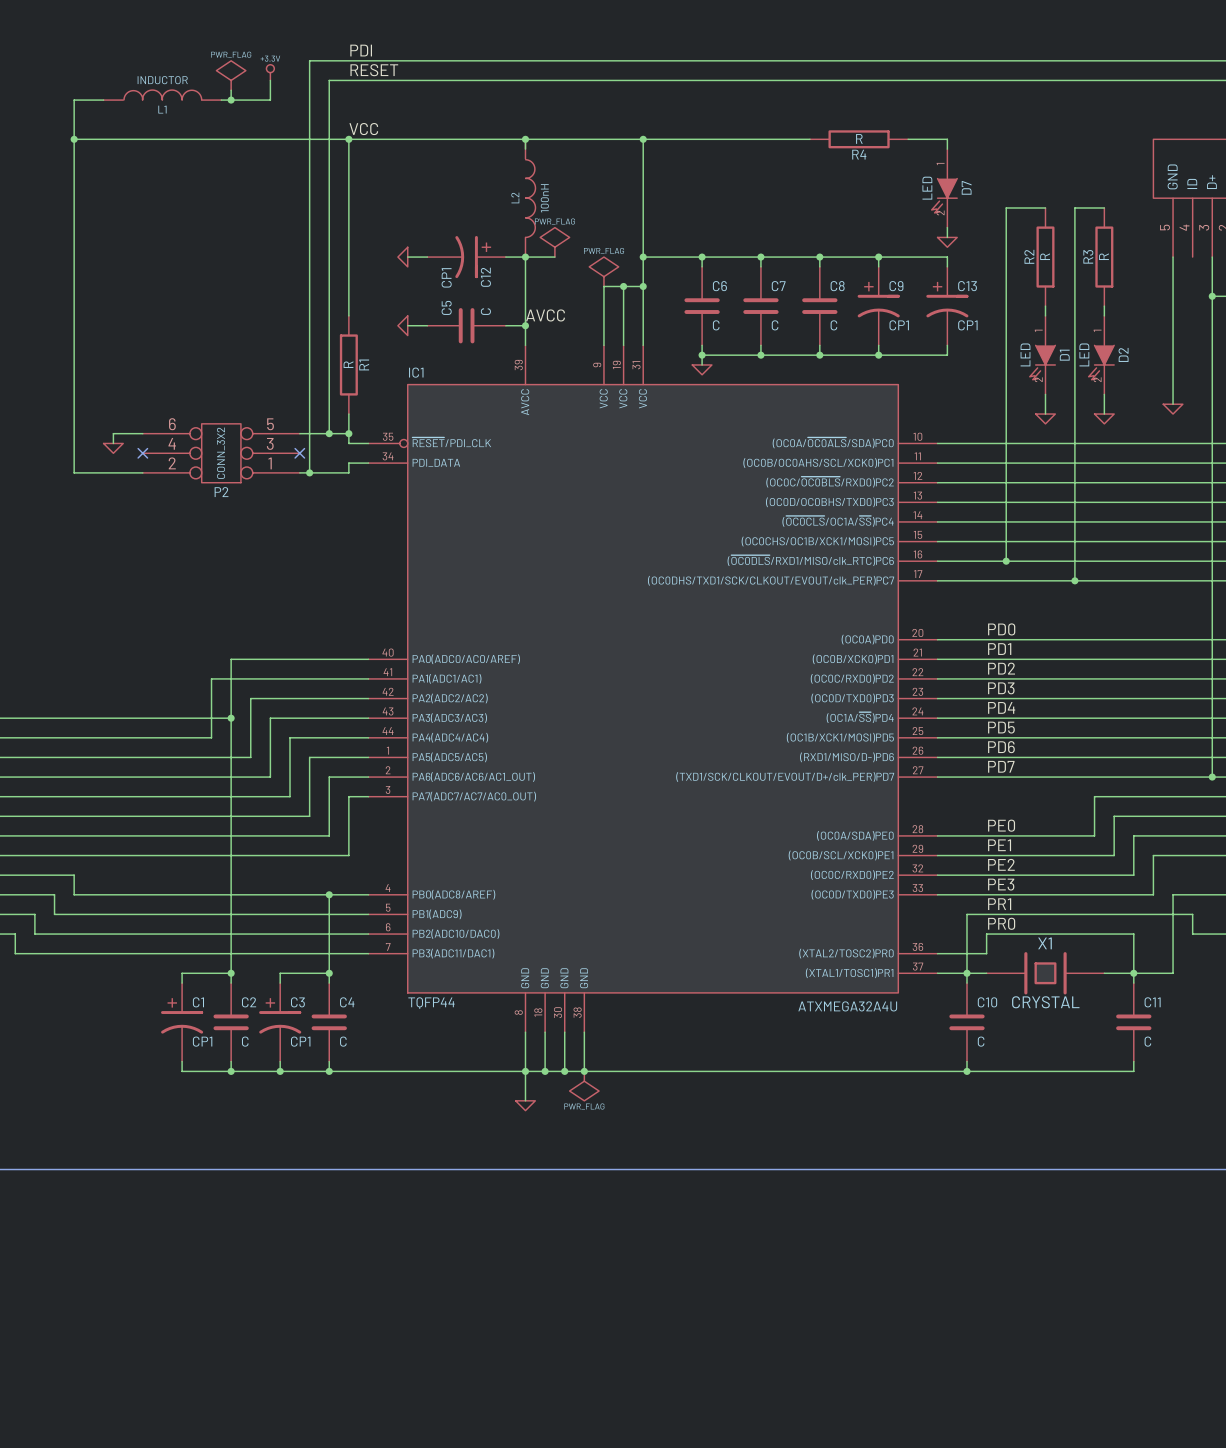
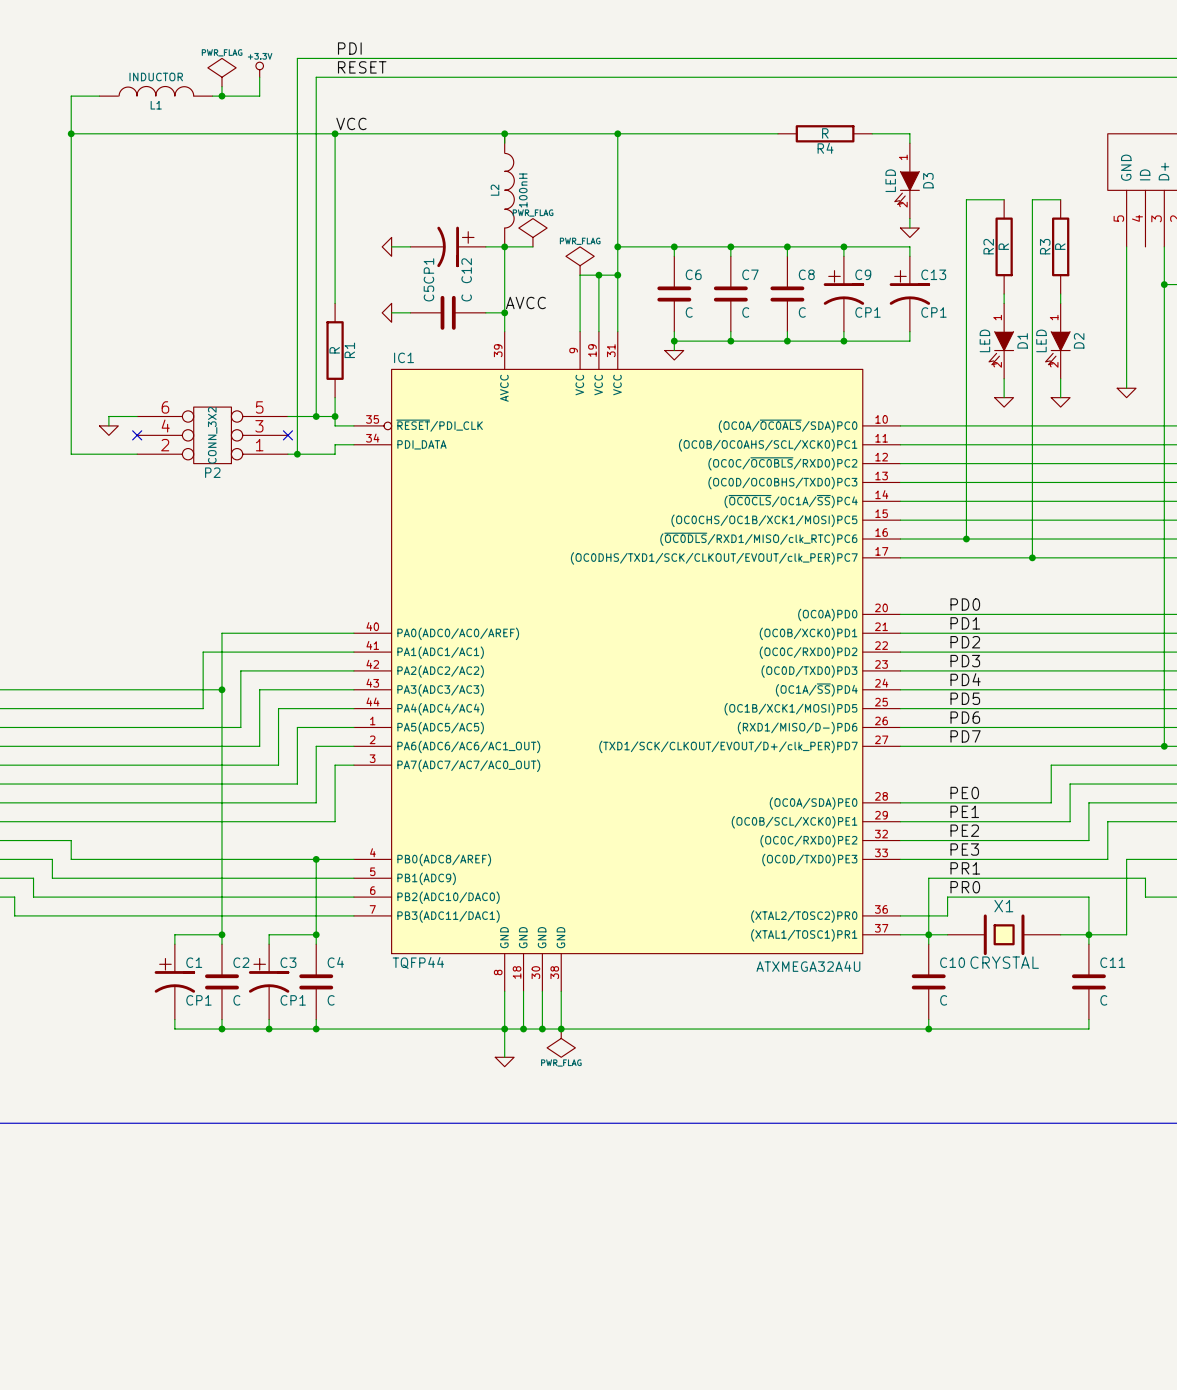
D7 name: D7 (966, 187) -> D3 (928, 180)

